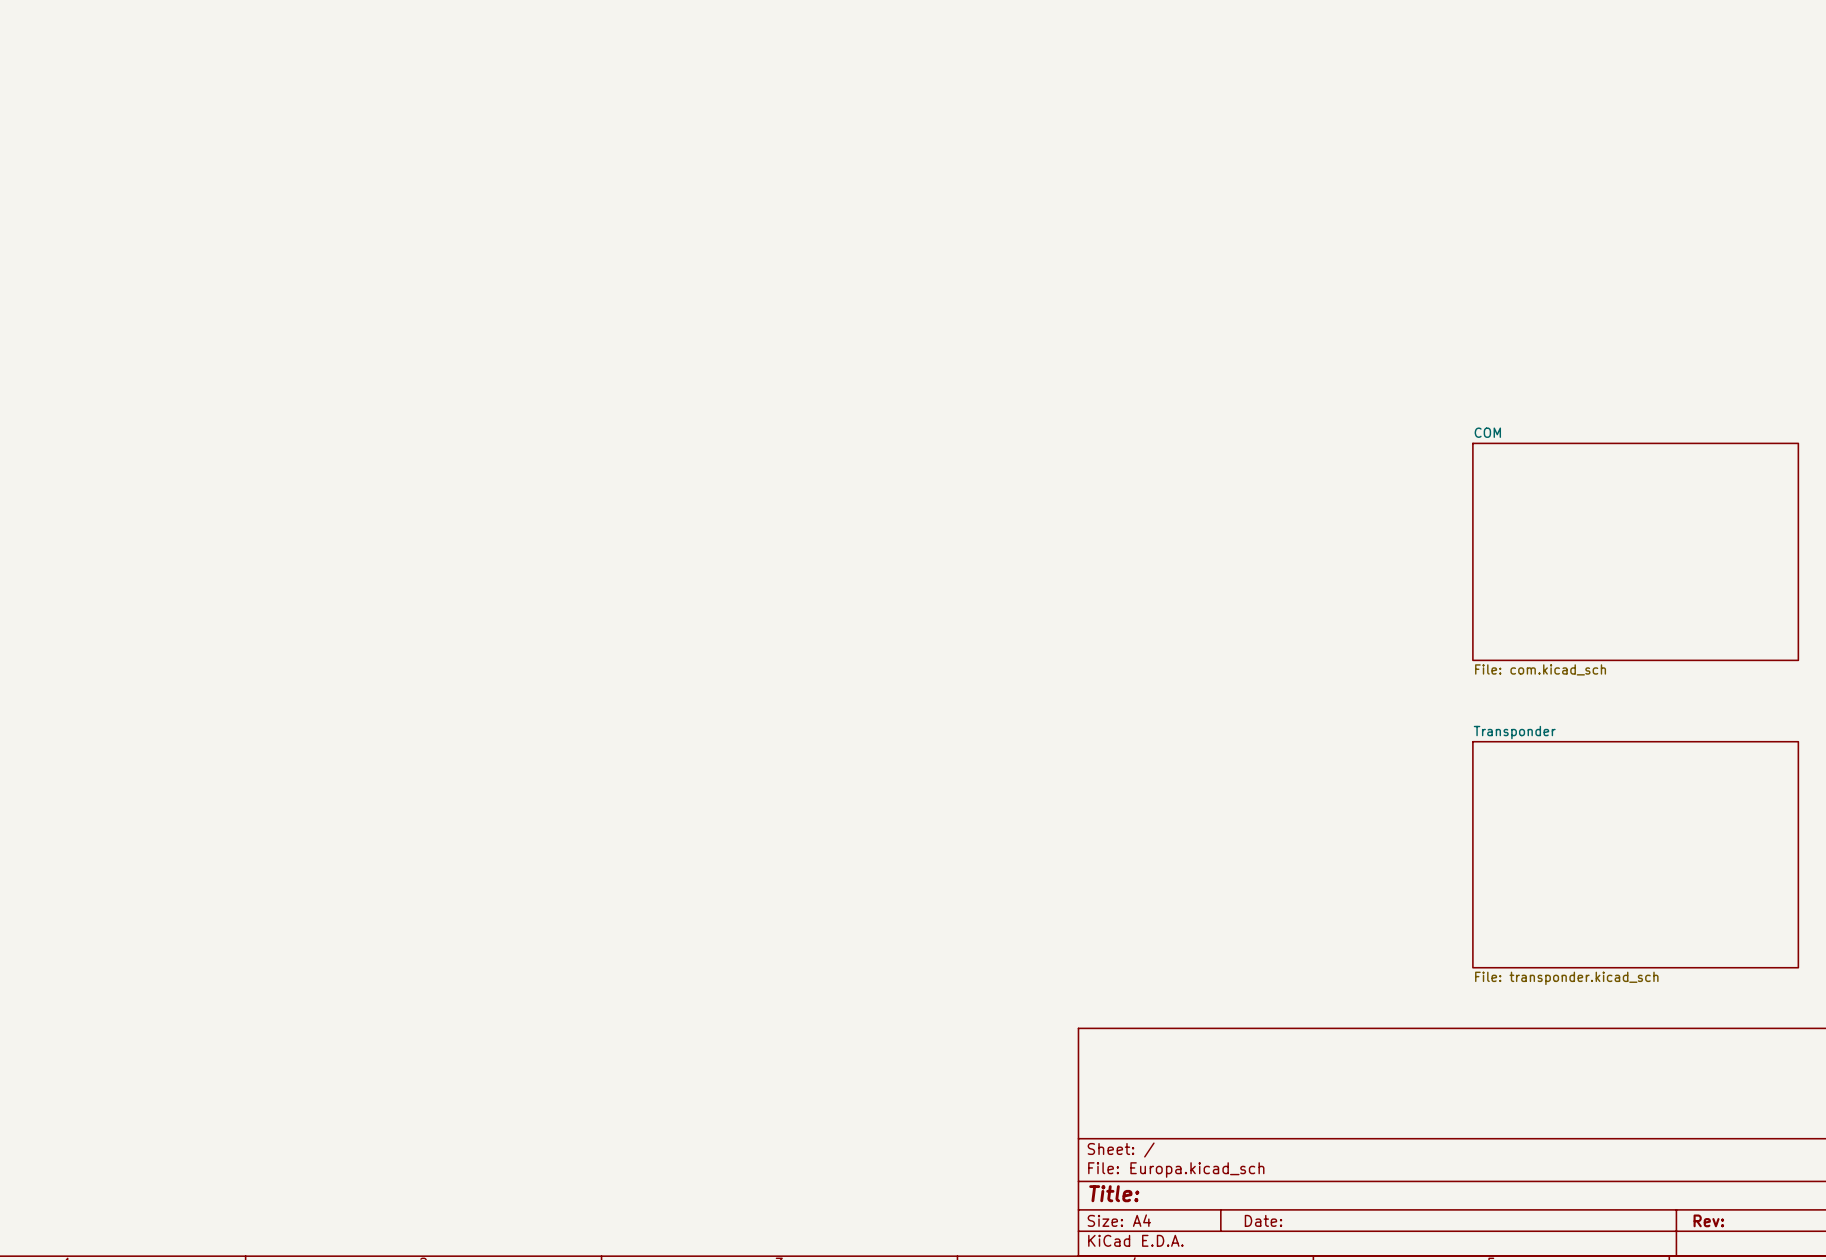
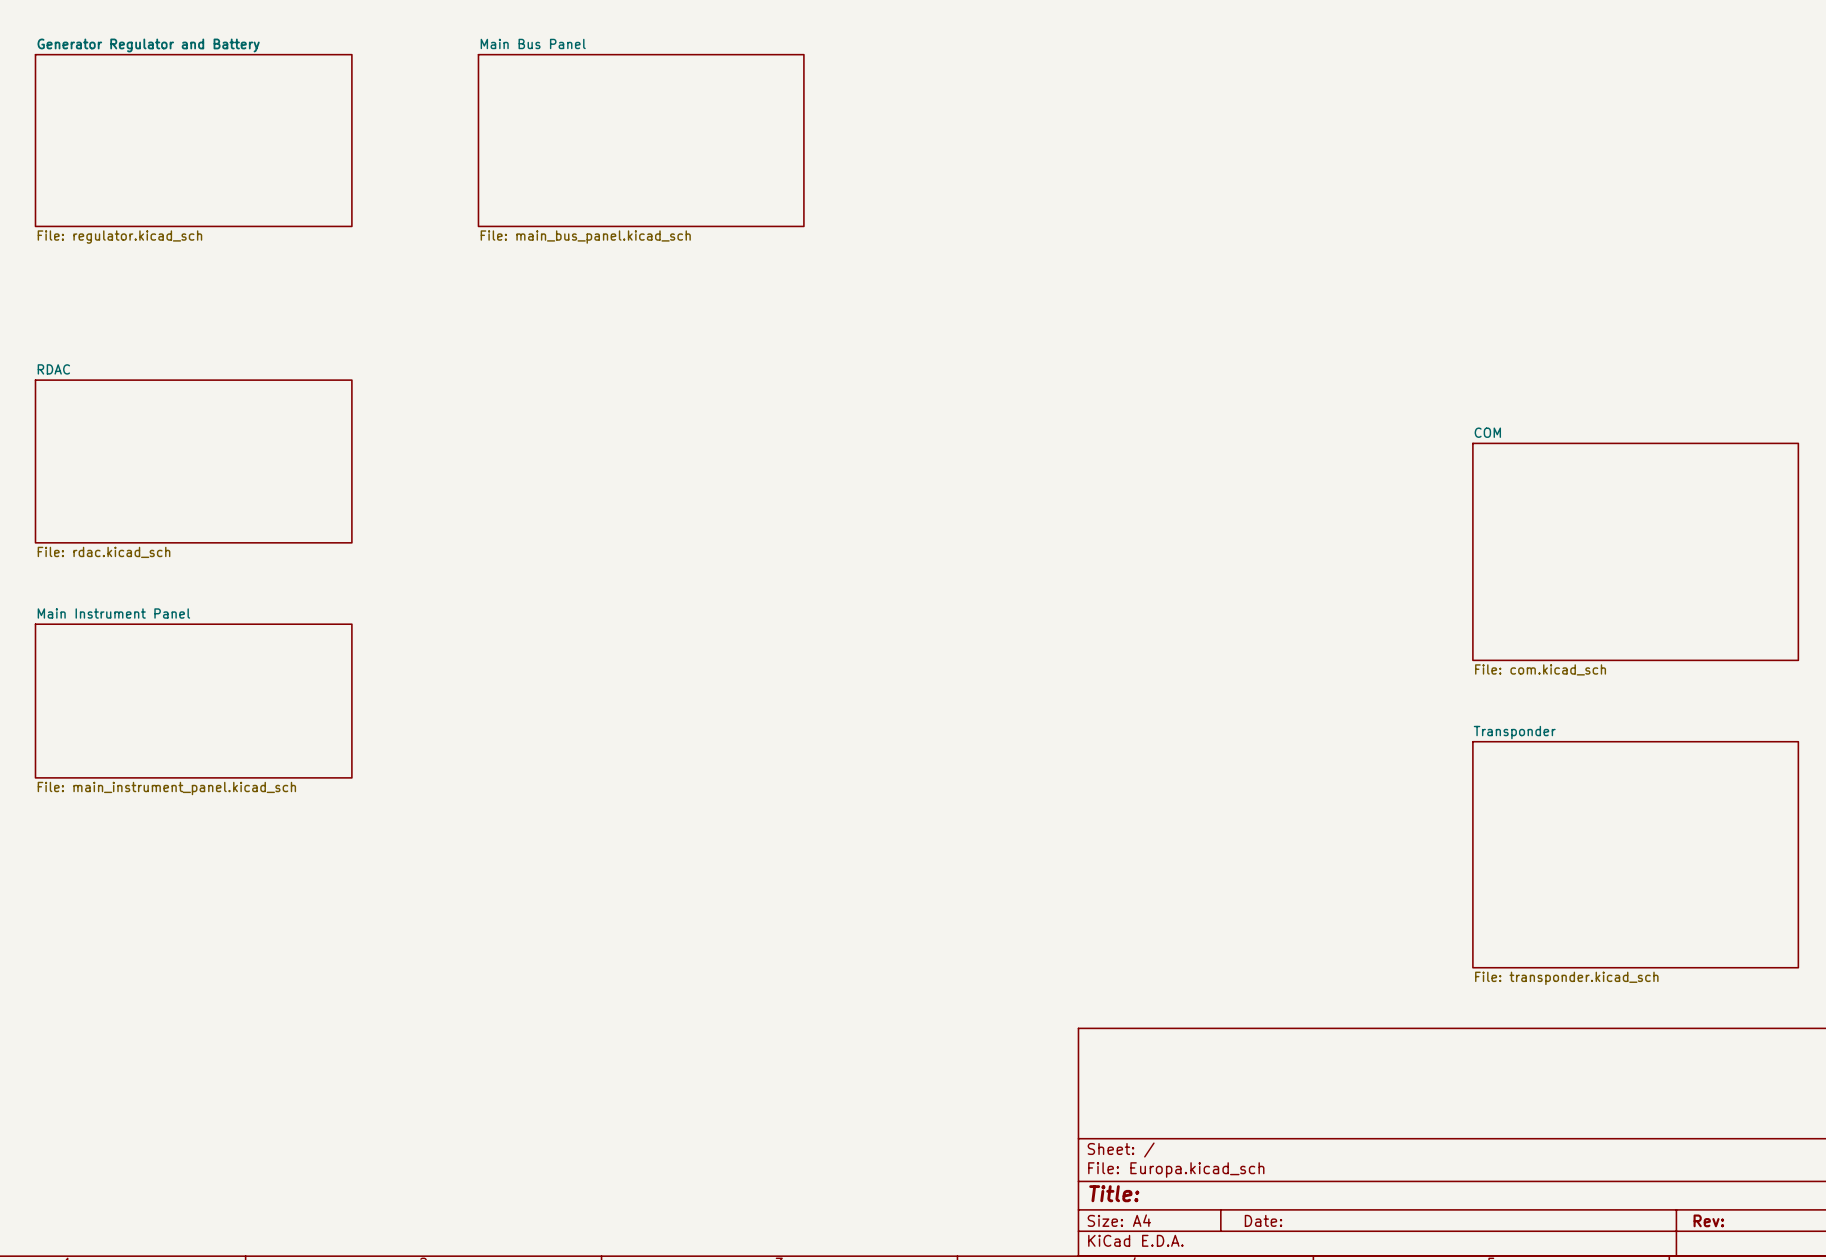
sheet Generator Regulator and Battery: none -> File: regulator.kicad_sch (193, 140)
sheet Main Bus Panel: none -> File: main_bus_panel.kicad_sch (641, 140)
sheet RDAC: none -> File: rdac.kicad_sch (193, 461)
sheet Main Instrument Panel: none -> File: main_instrument_panel.kicad_sch (193, 701)

